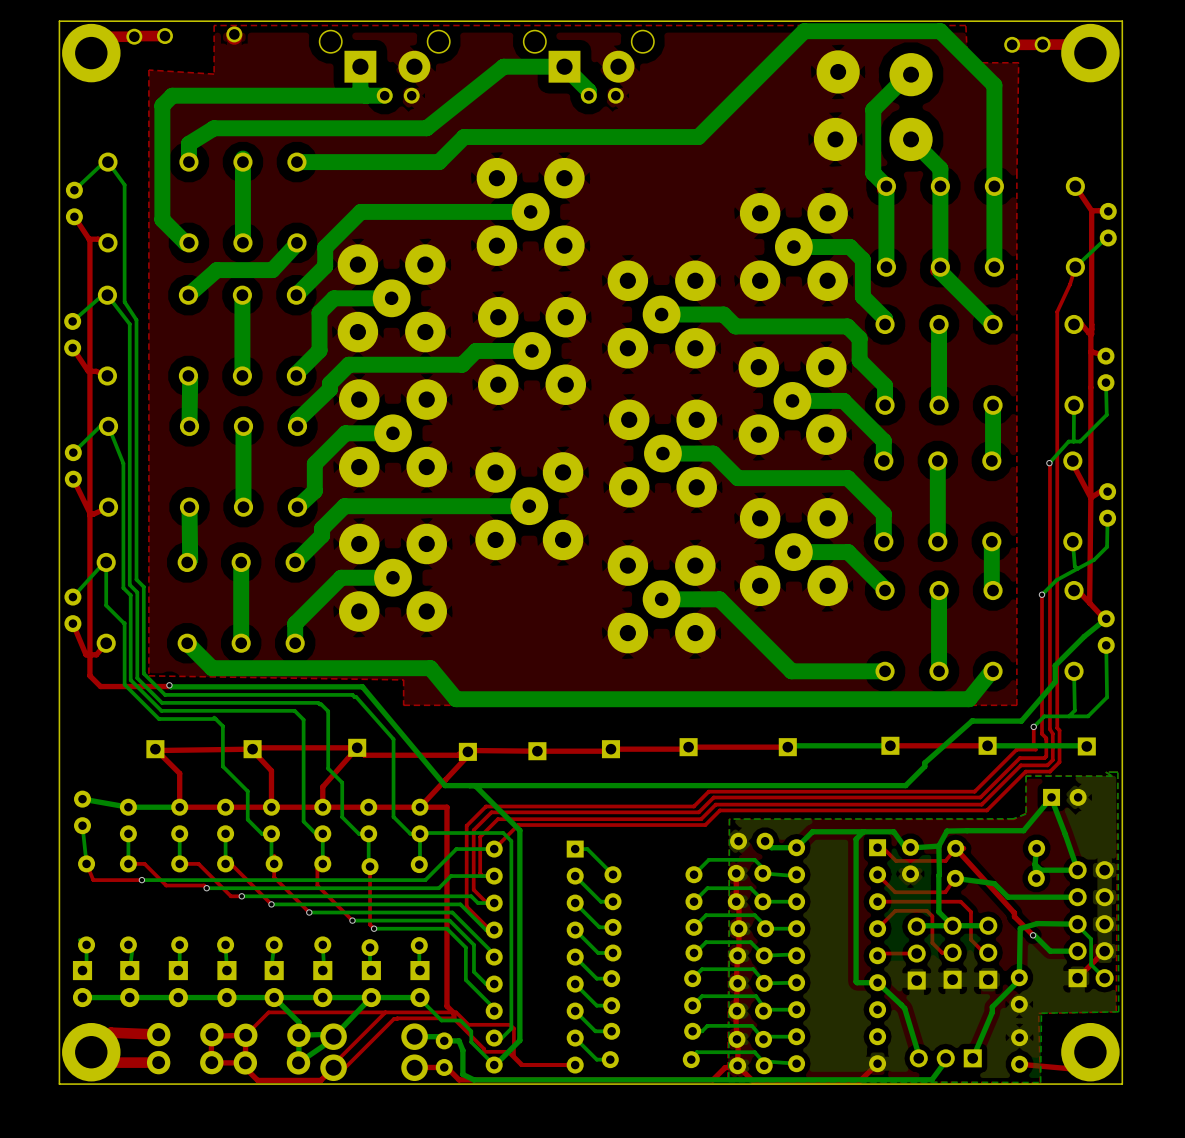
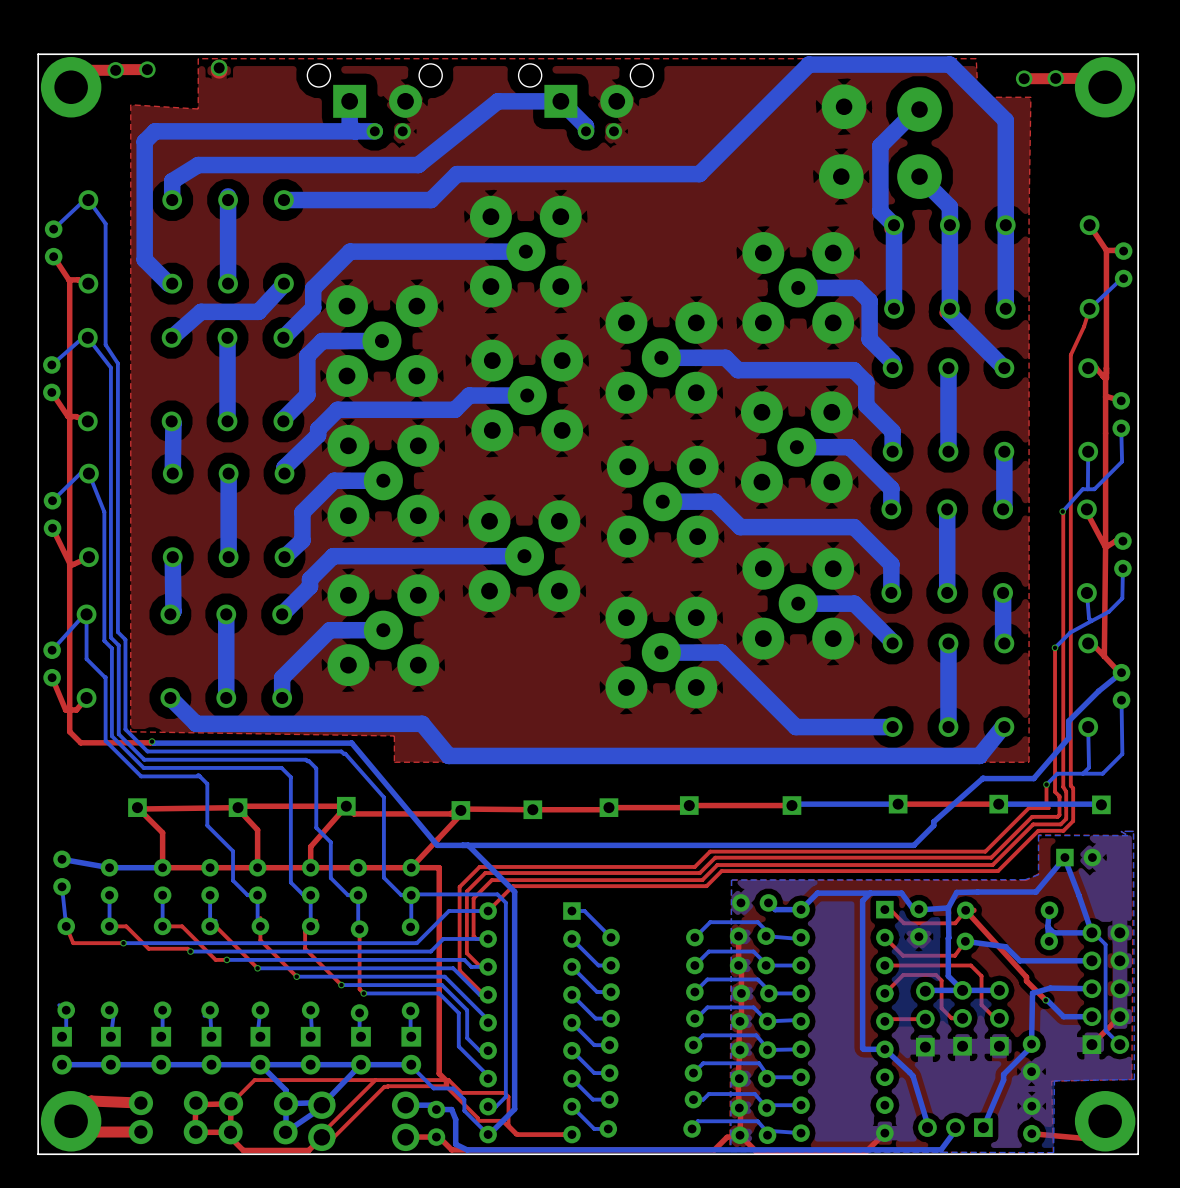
bottom track: (1077, 924) (1091, 939) (1091, 964) -> (1093, 932) (1105, 944) (1105, 1030)

